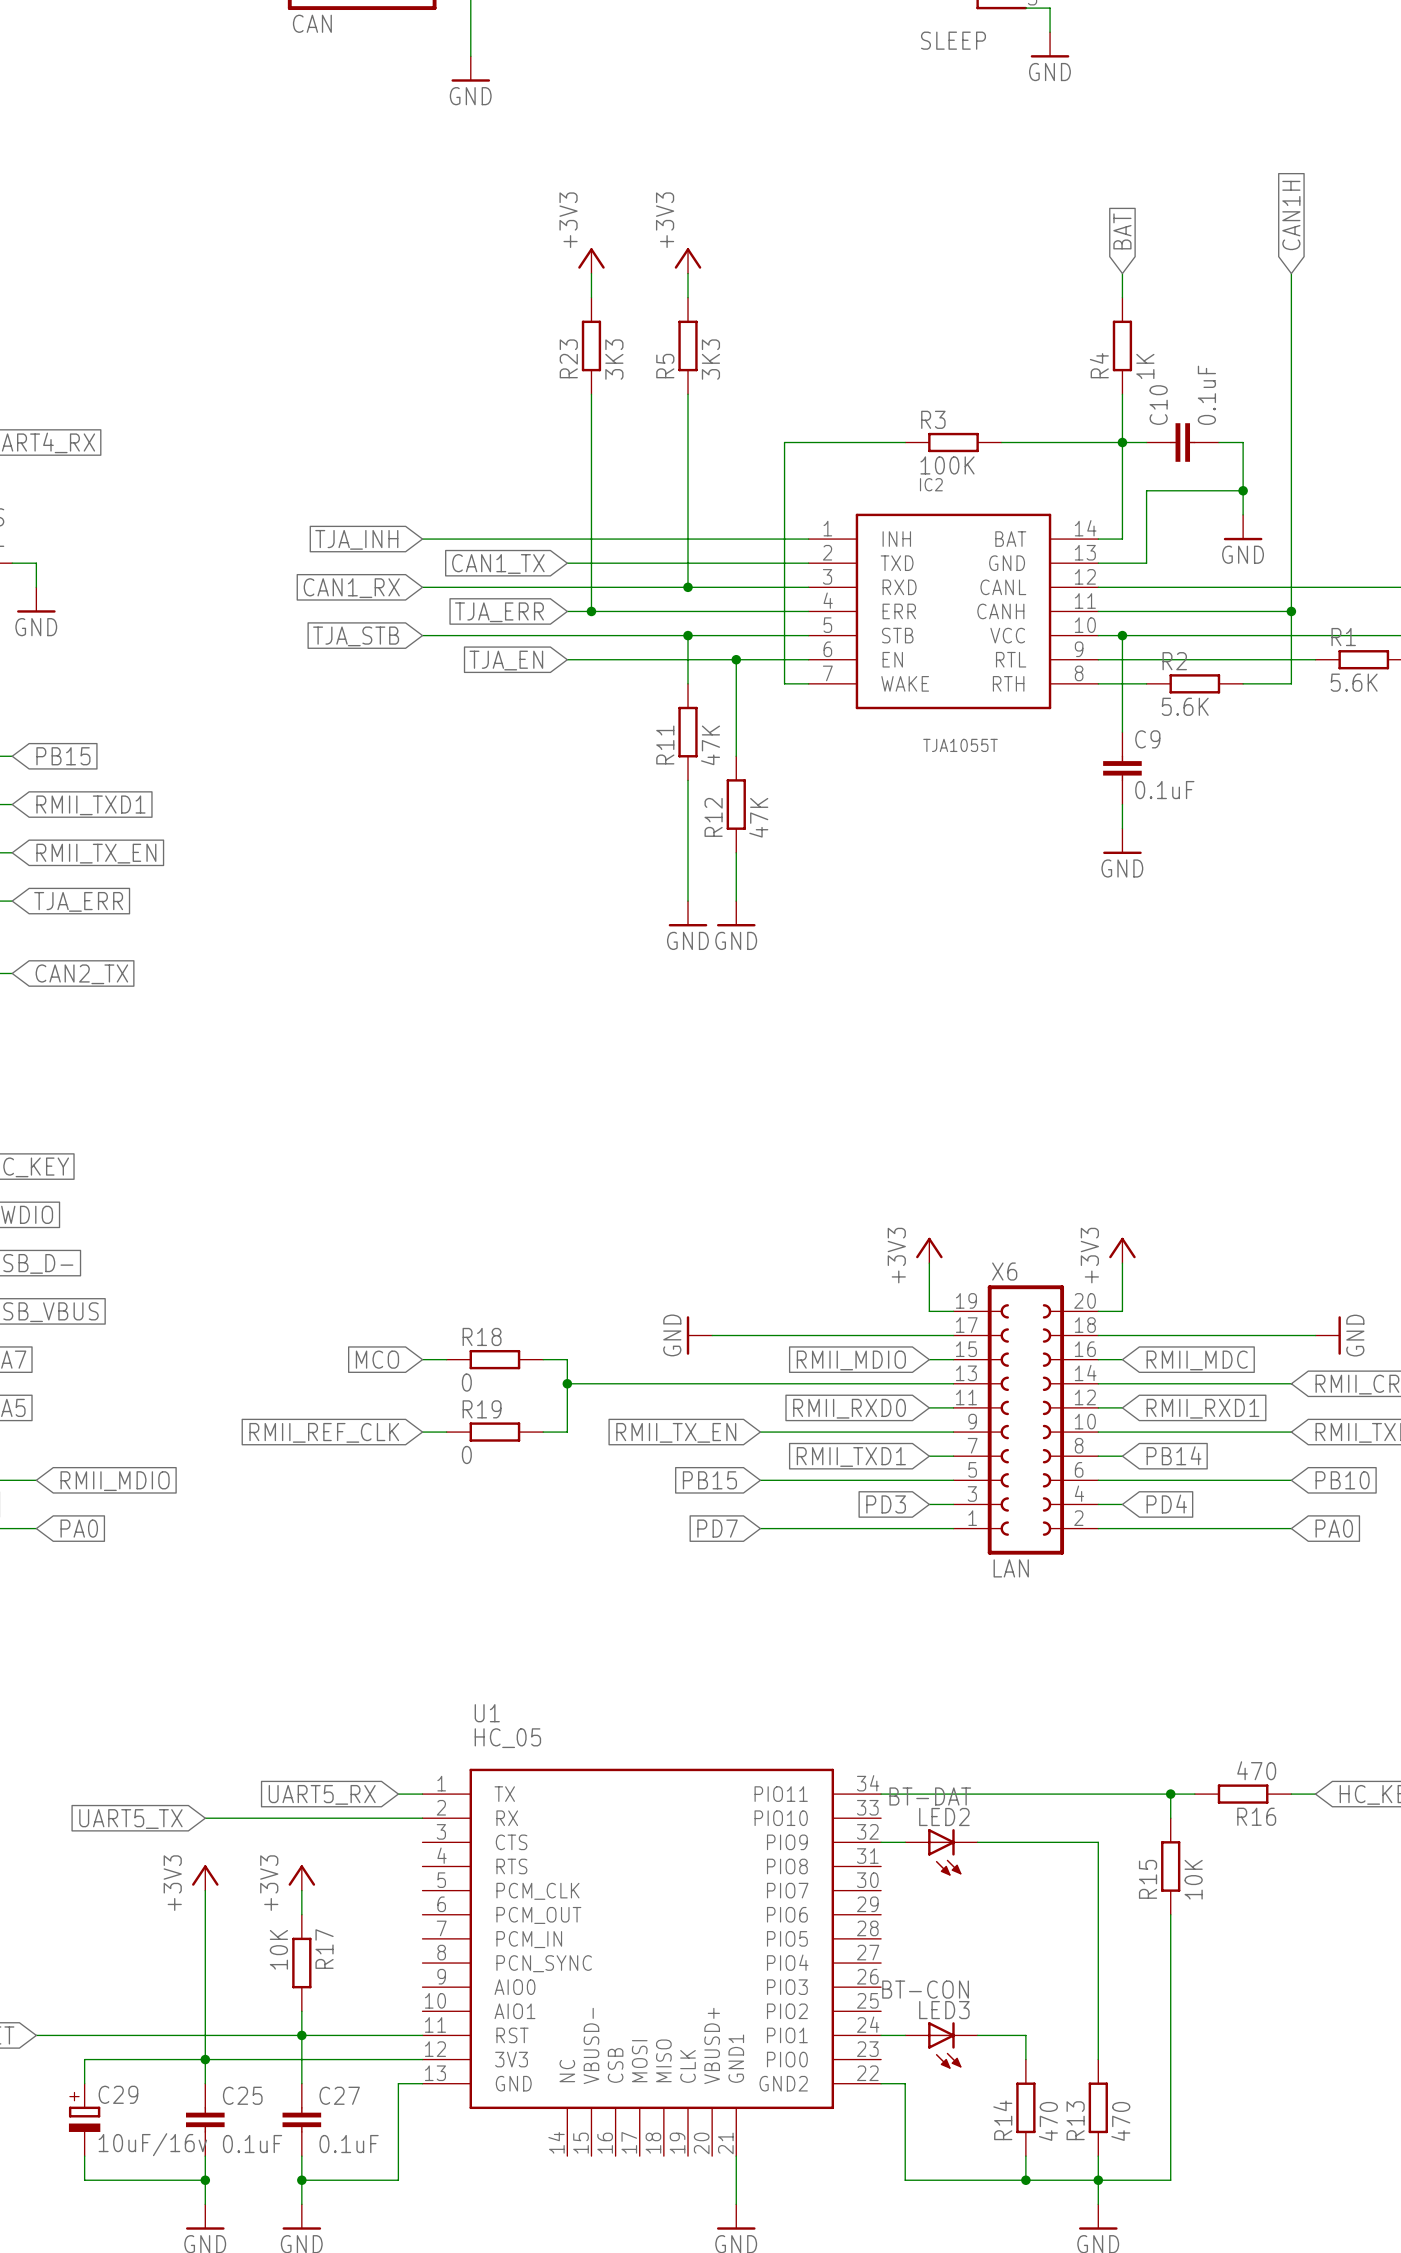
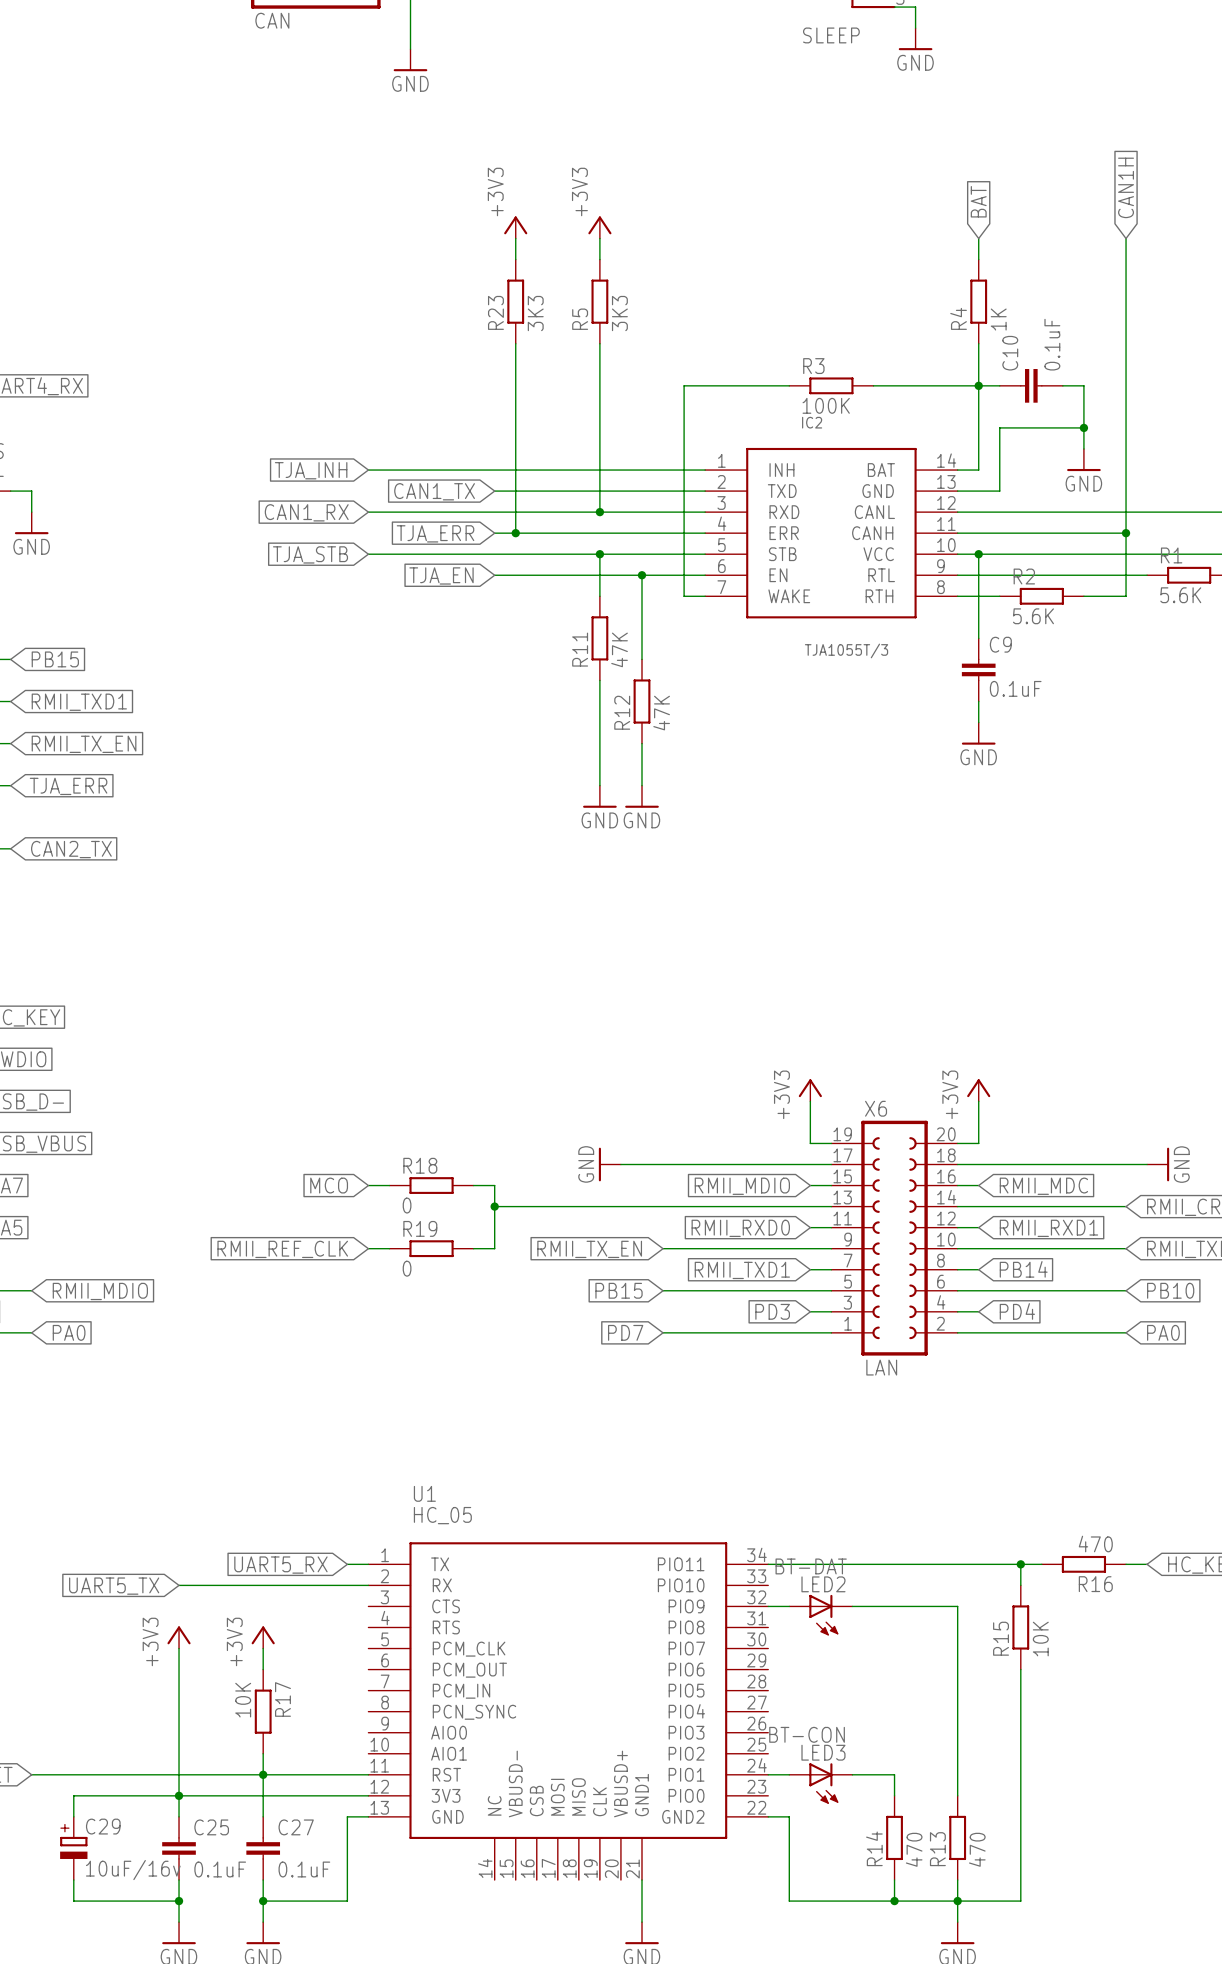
IC2 value: TJA1055T (960, 745) -> TJA1055T/3 (846, 650)

